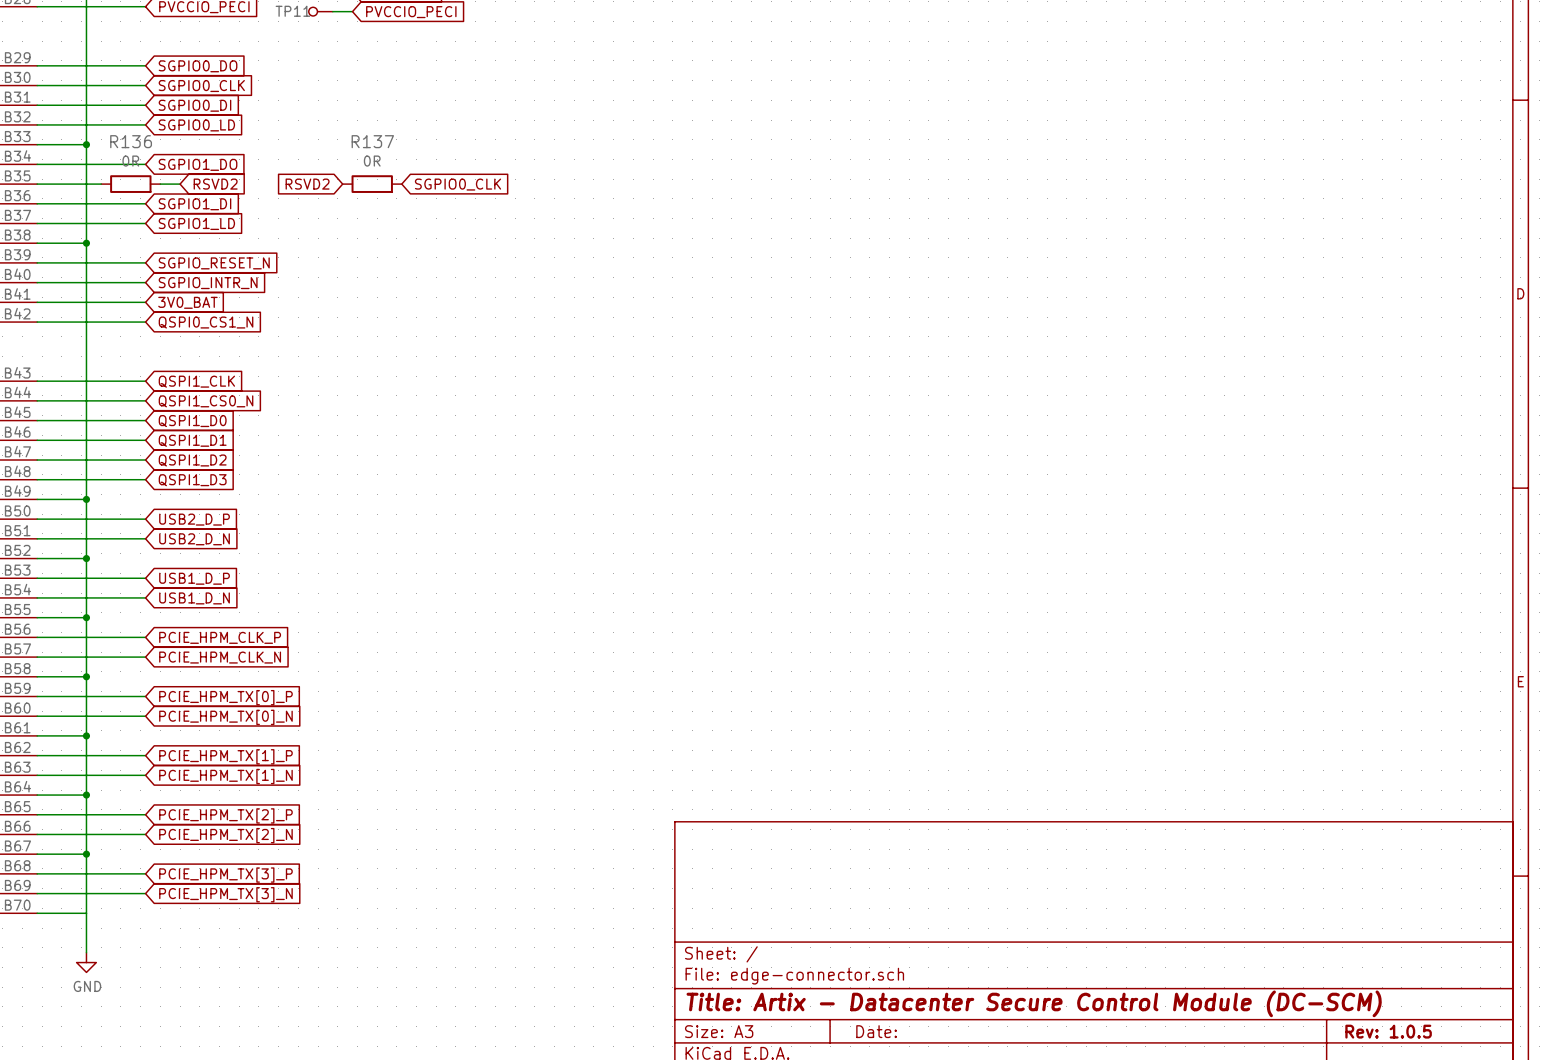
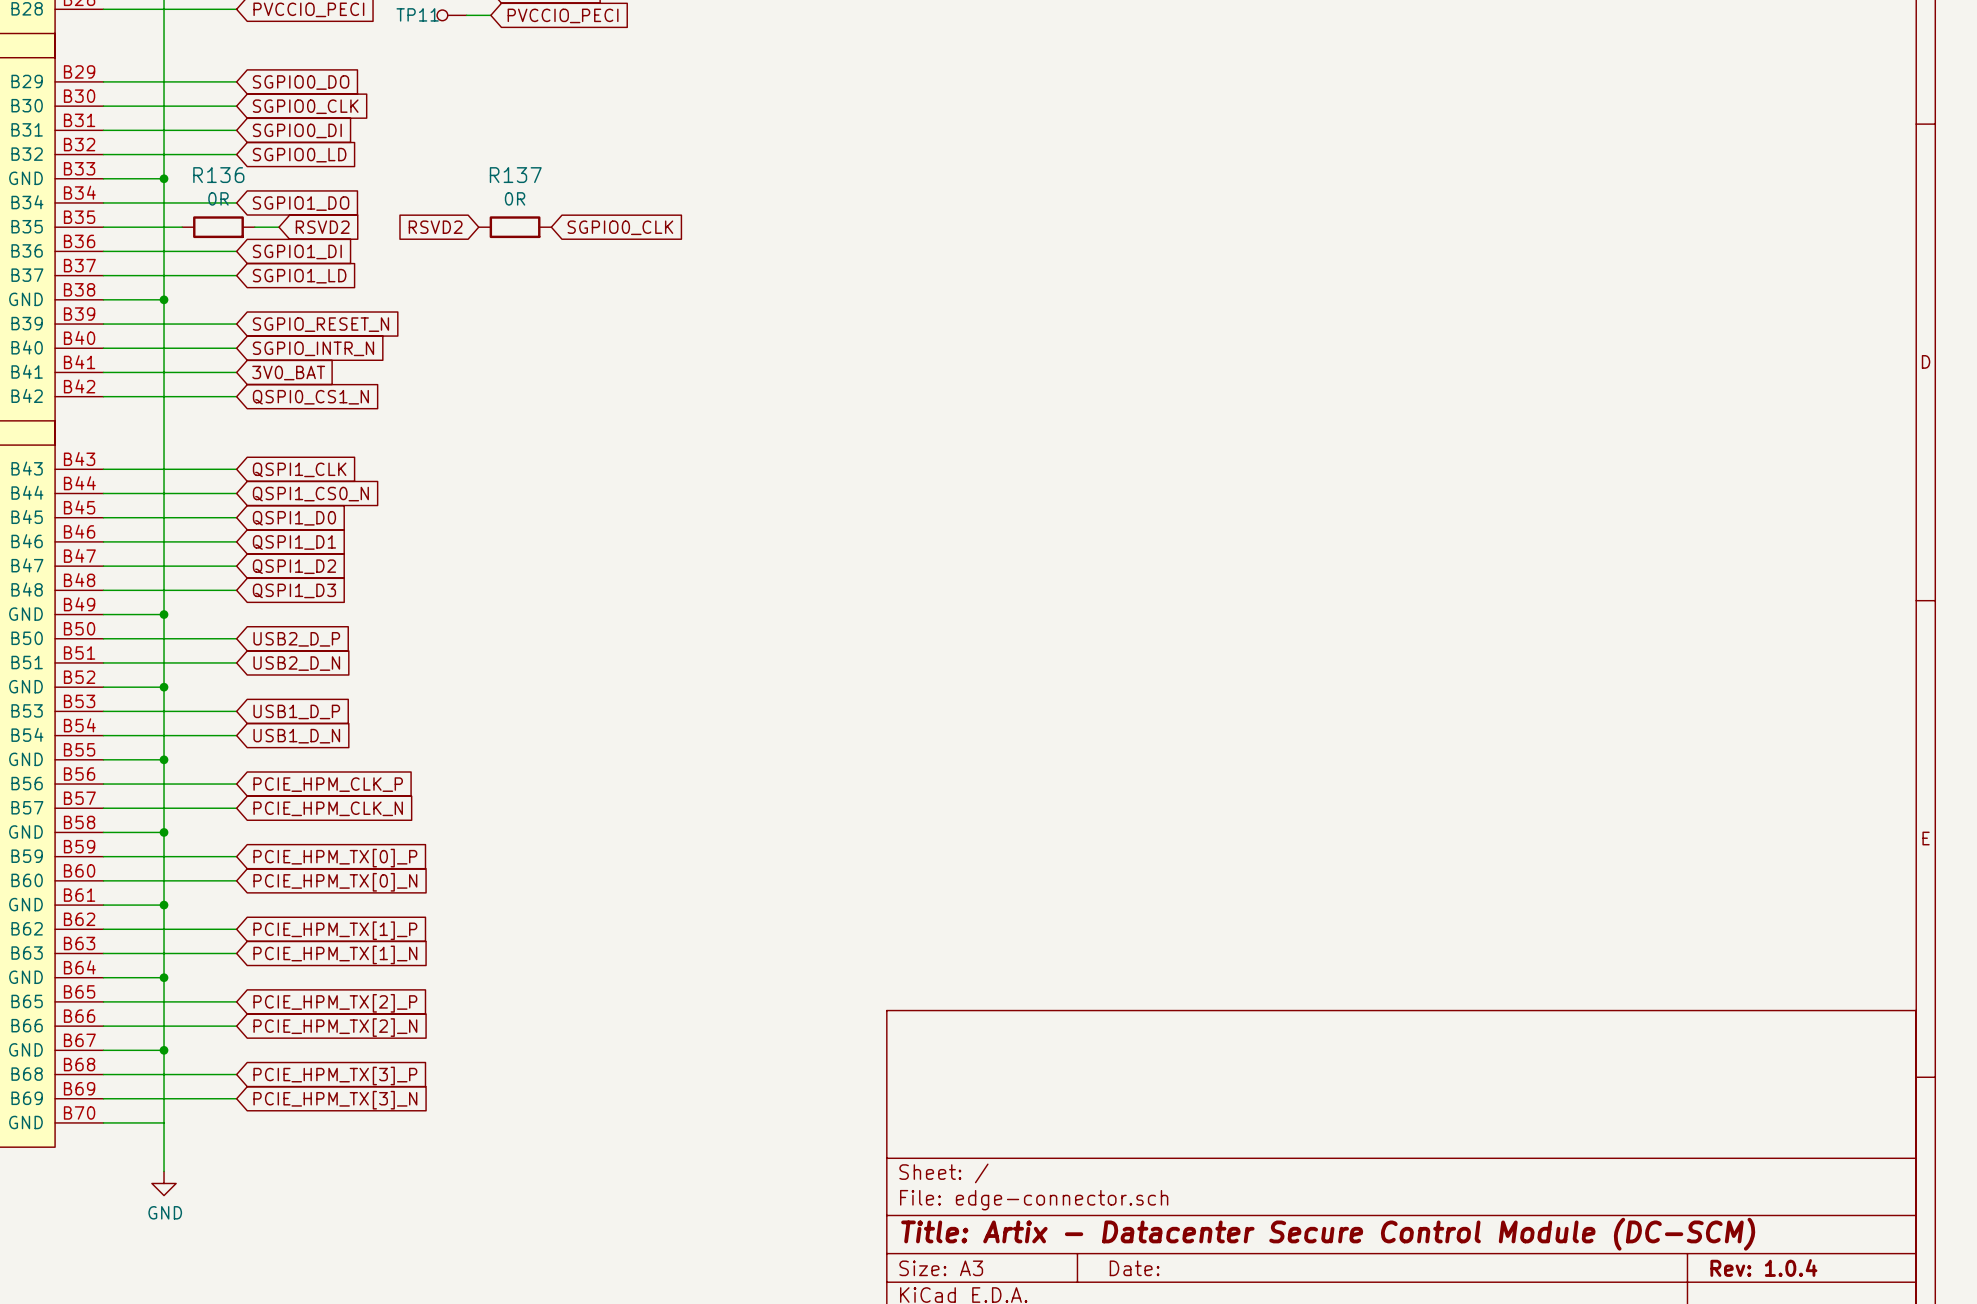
title block: Rev: 1.0.5 (1388, 1031) -> Rev: 1.0.4 (1763, 1267)

